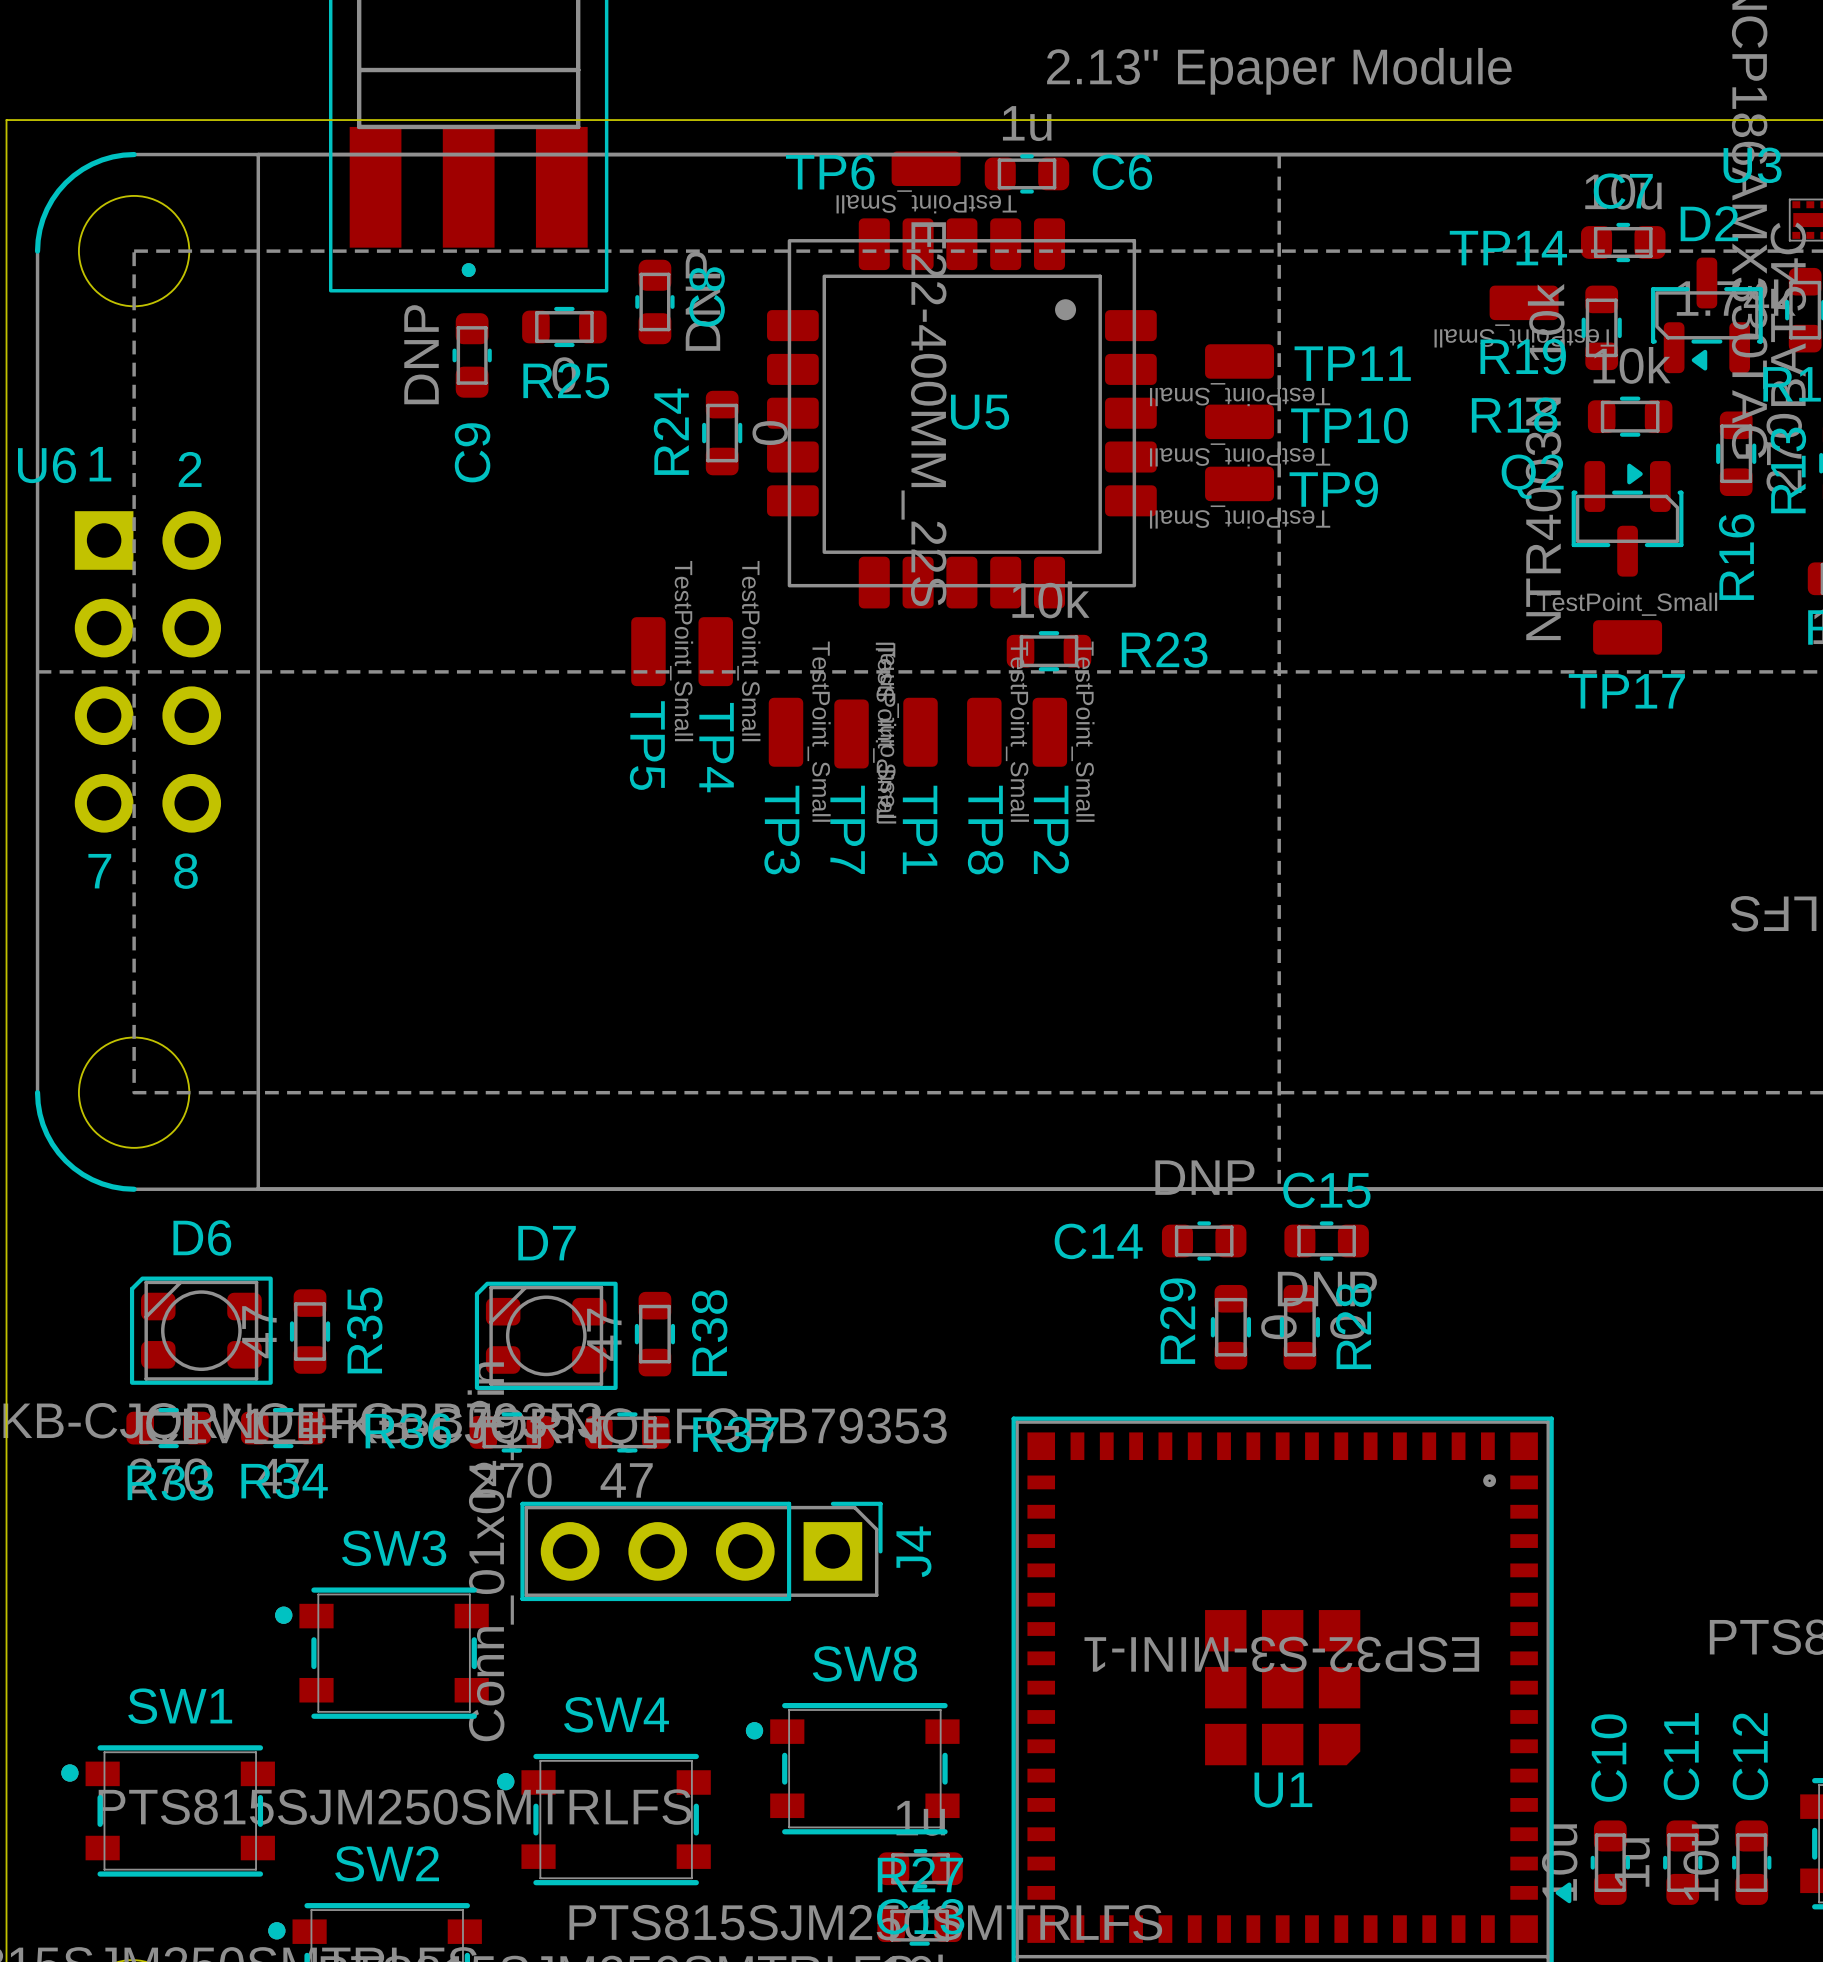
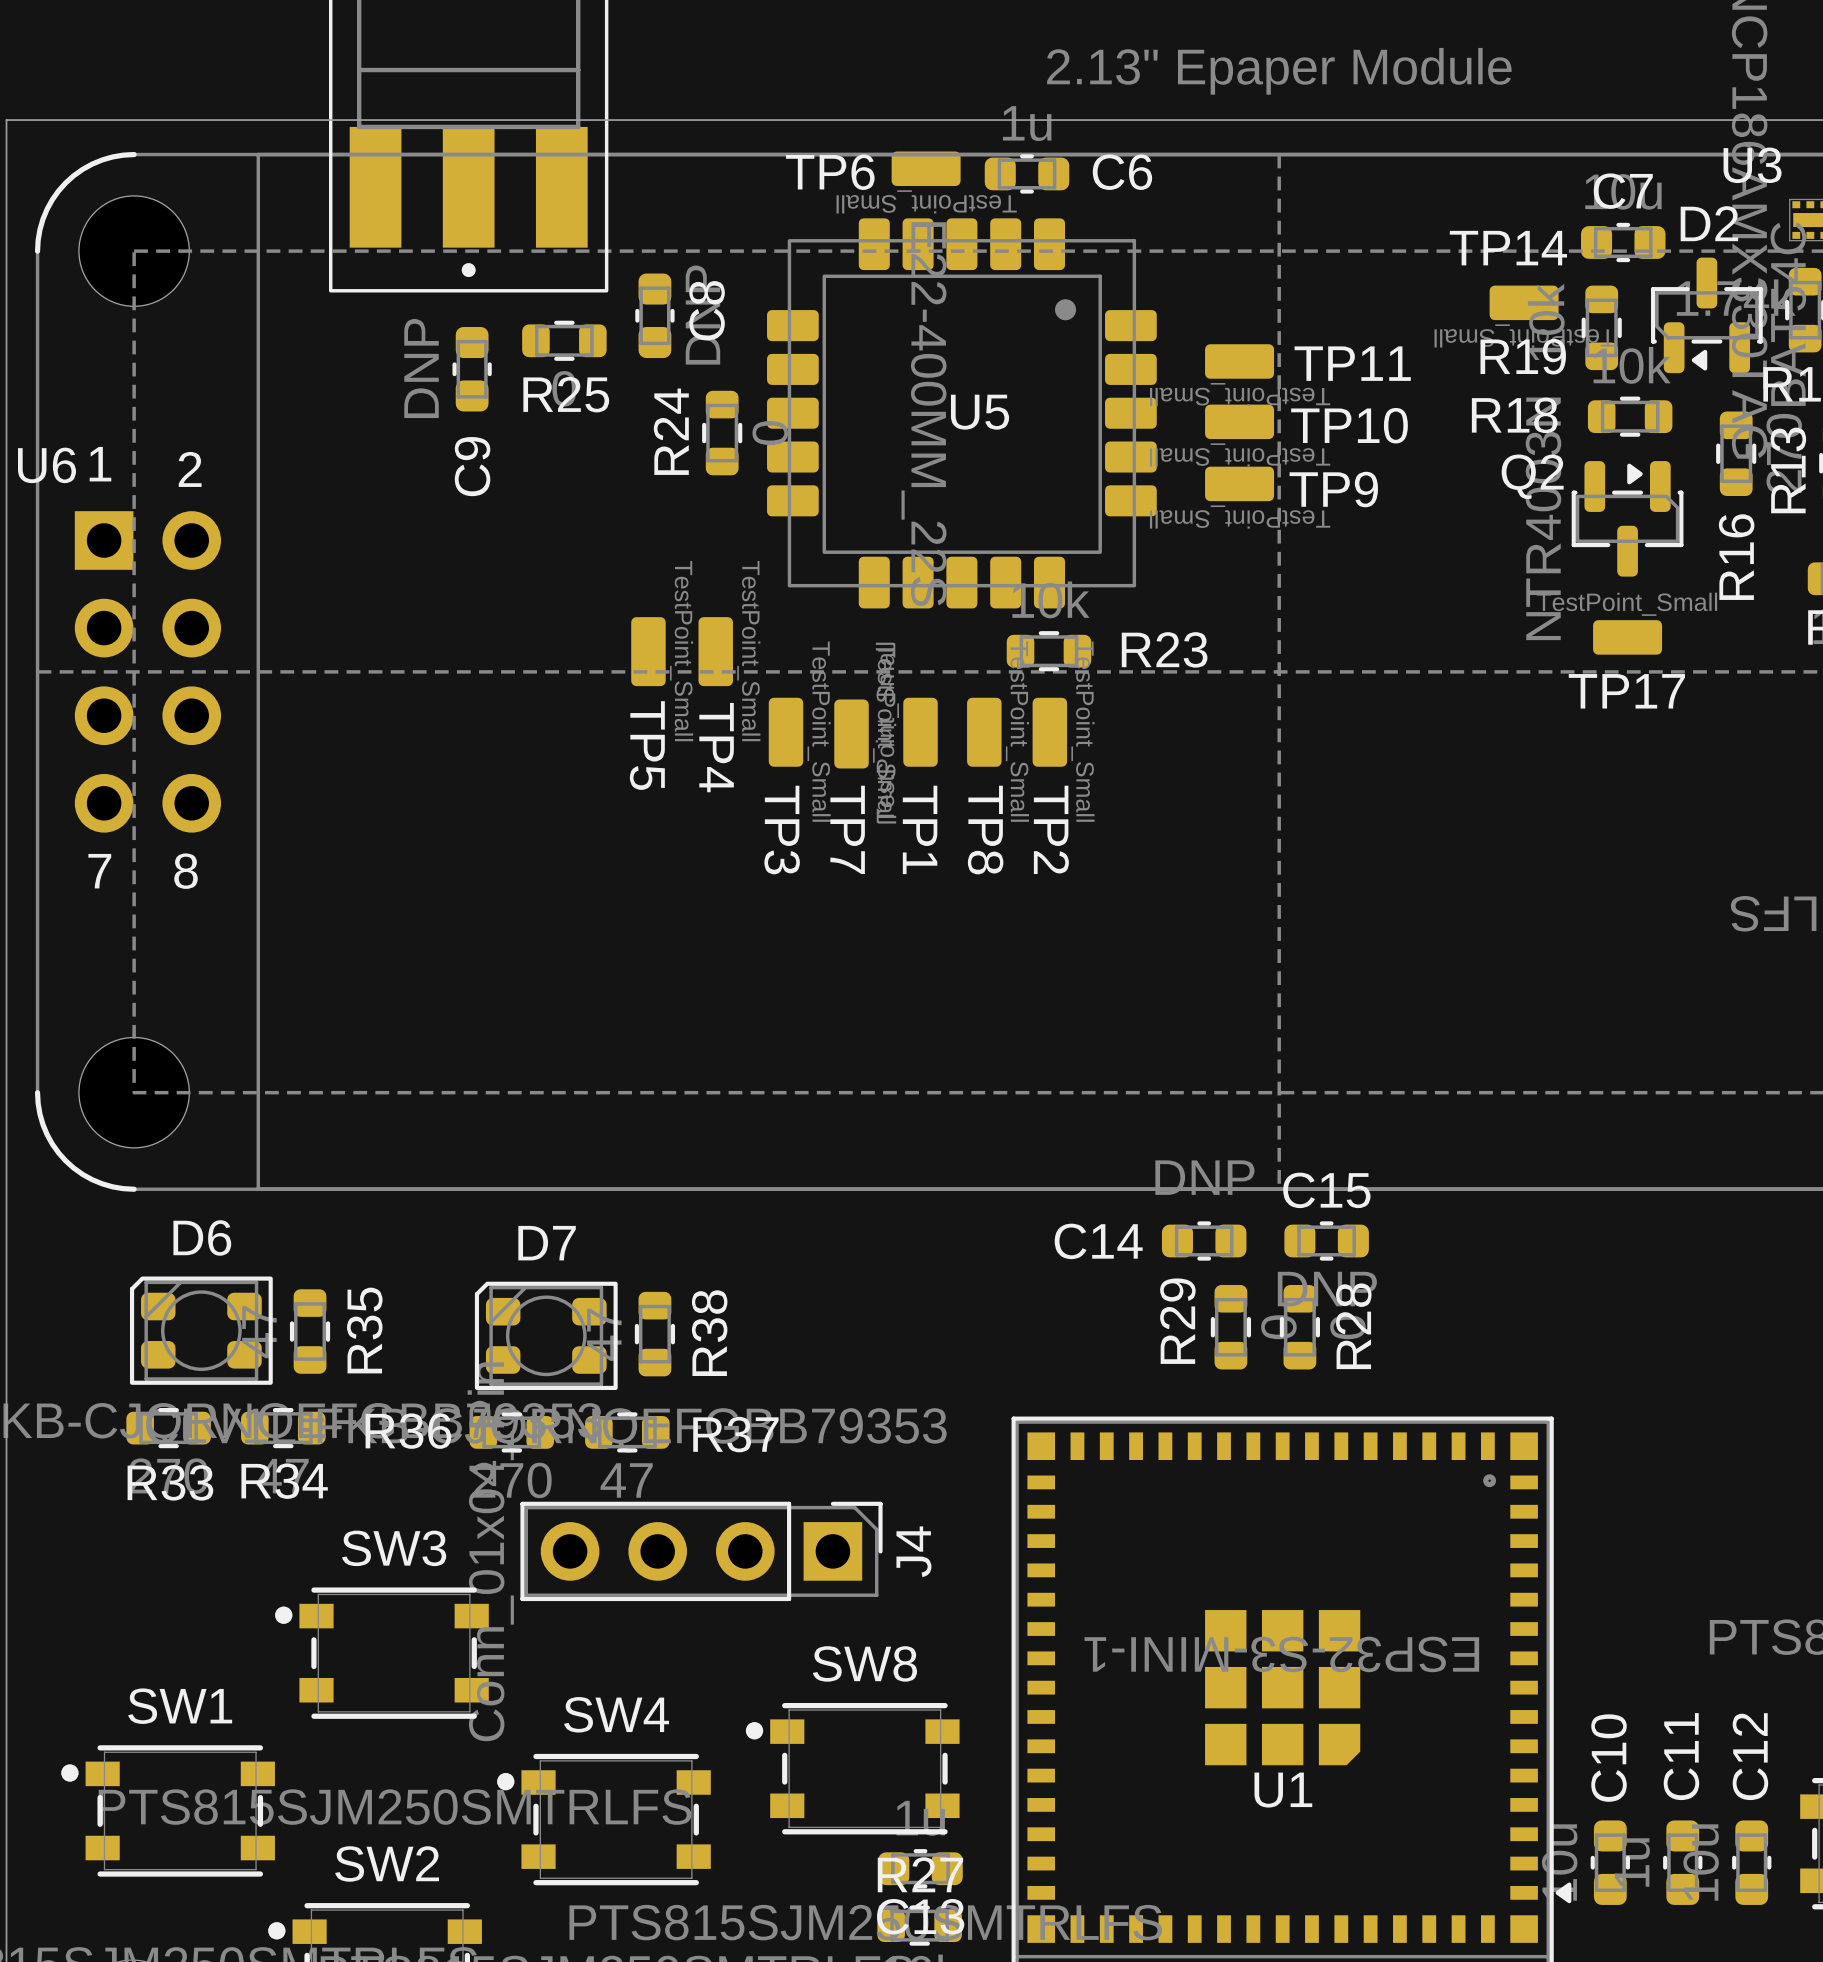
C8 position: (654, 301) -> (654, 315)
R25 position: (564, 326) -> (564, 340)
C9 position: (472, 355) -> (472, 369)

